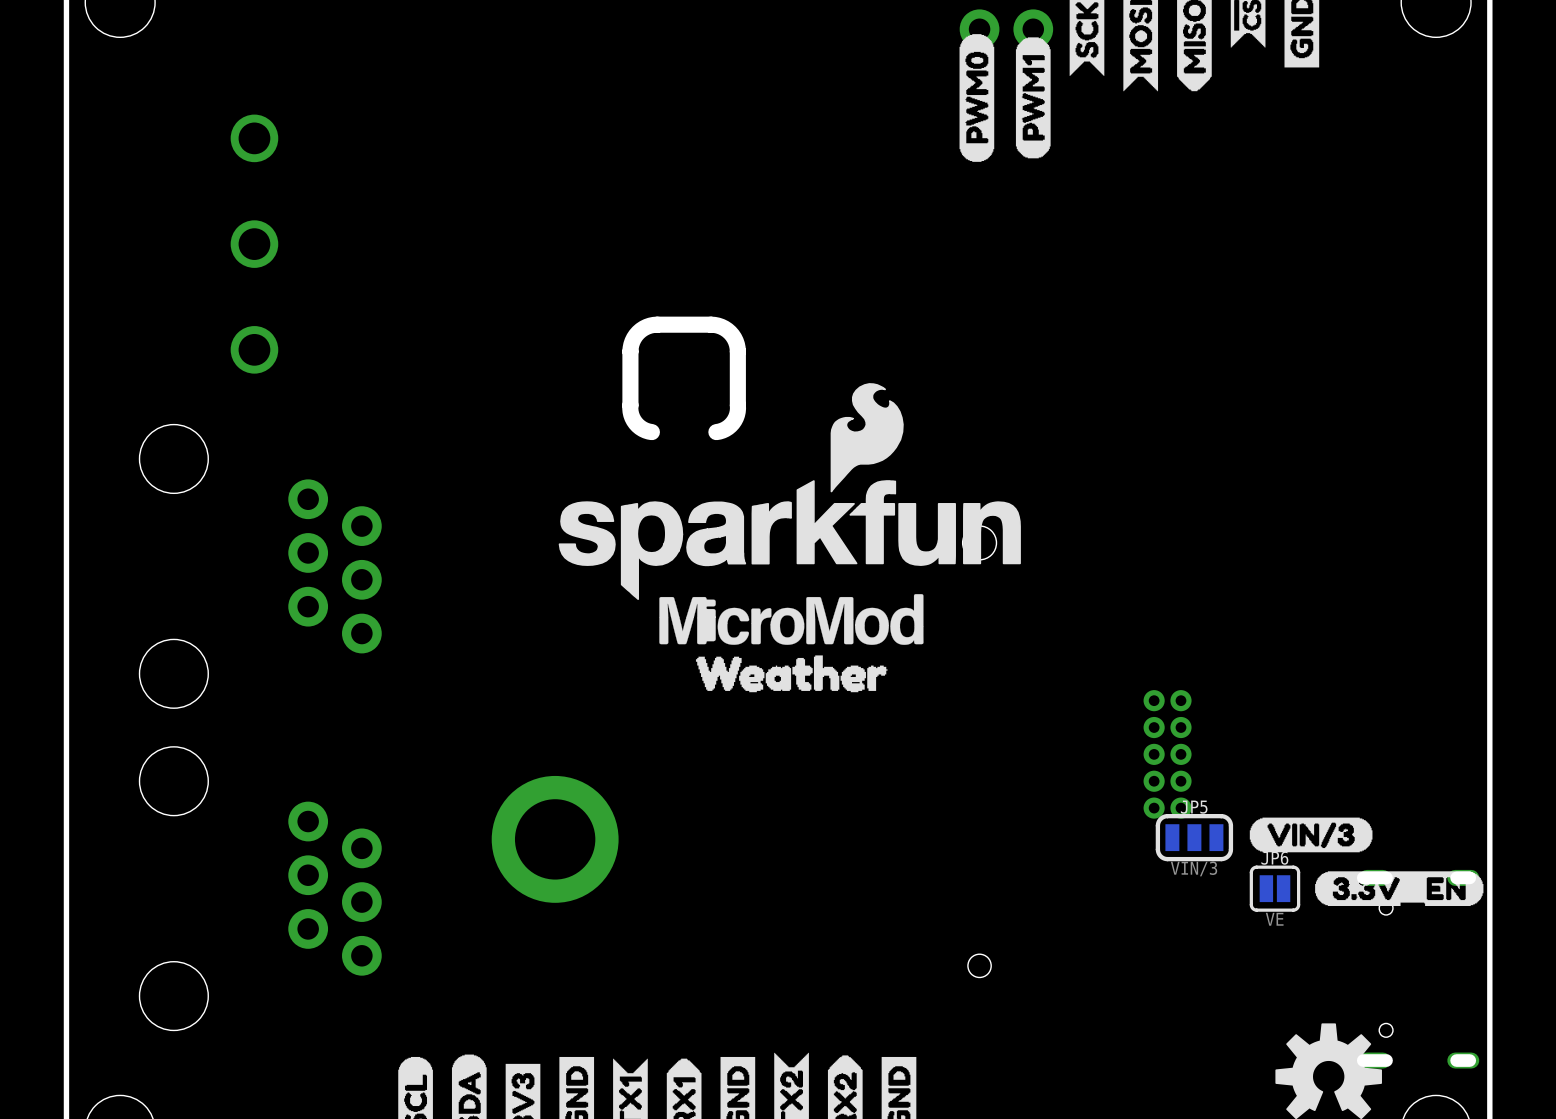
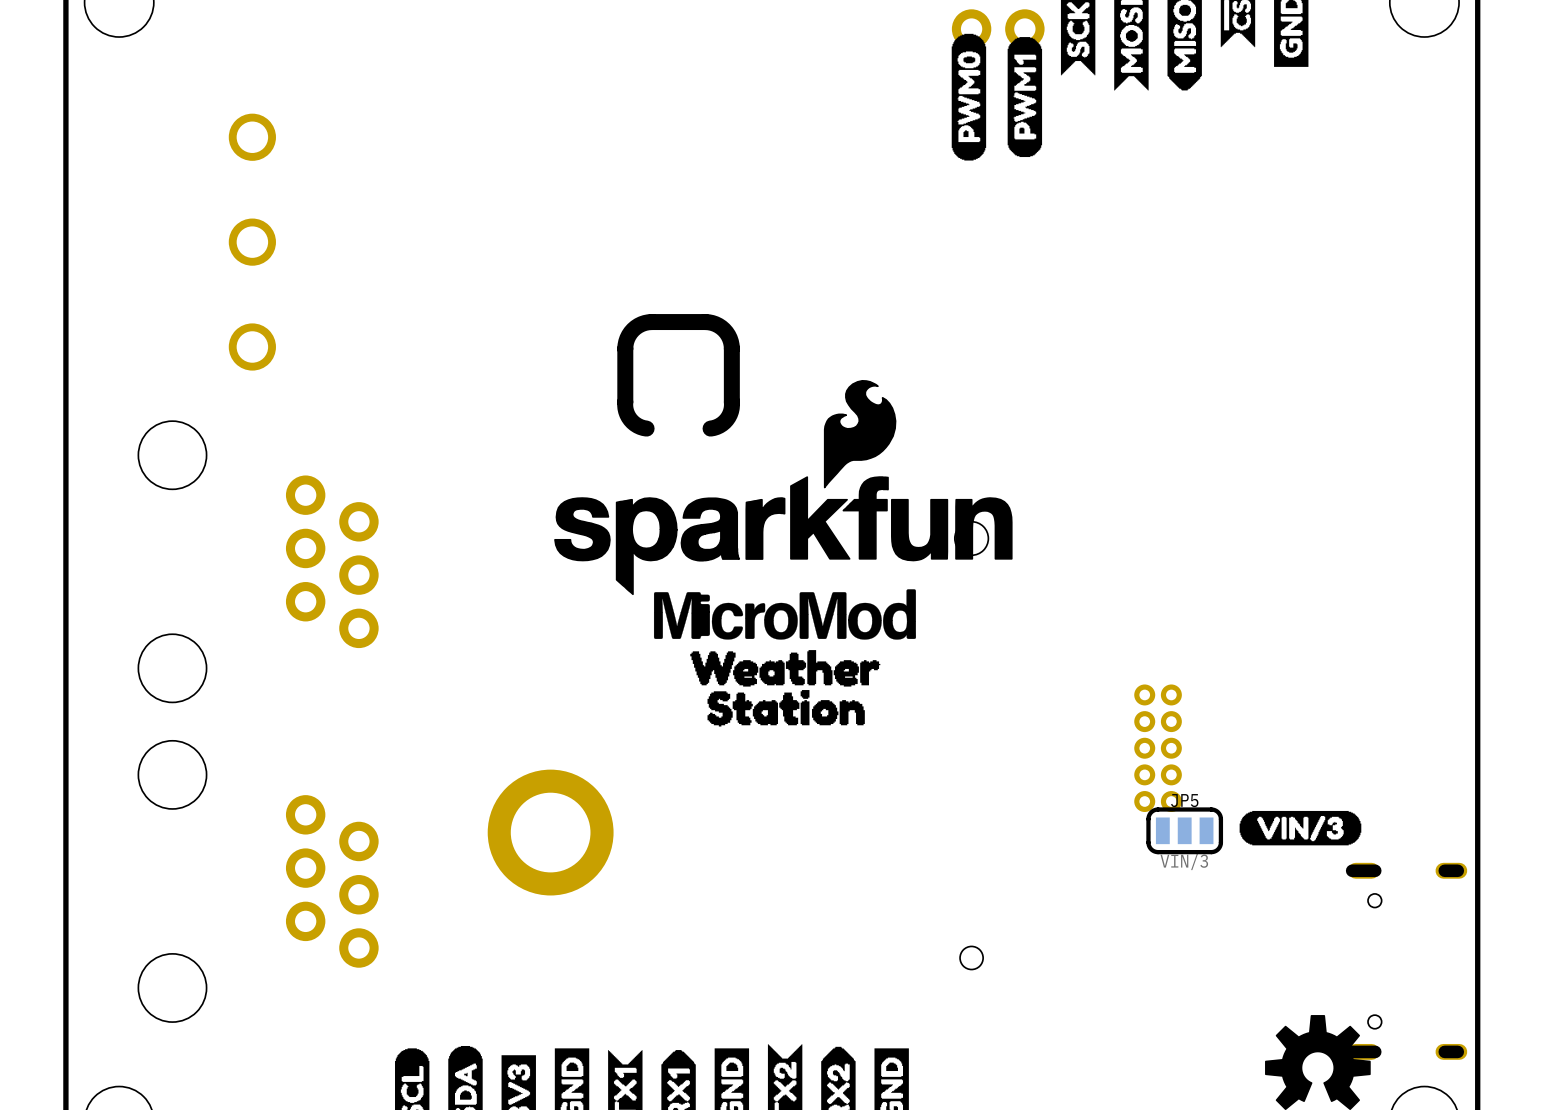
drawing: none -> [707, 690, 865, 727]
drawing: [1315, 871, 1484, 906] -> none
JP6: VE (1274, 888) -> none

